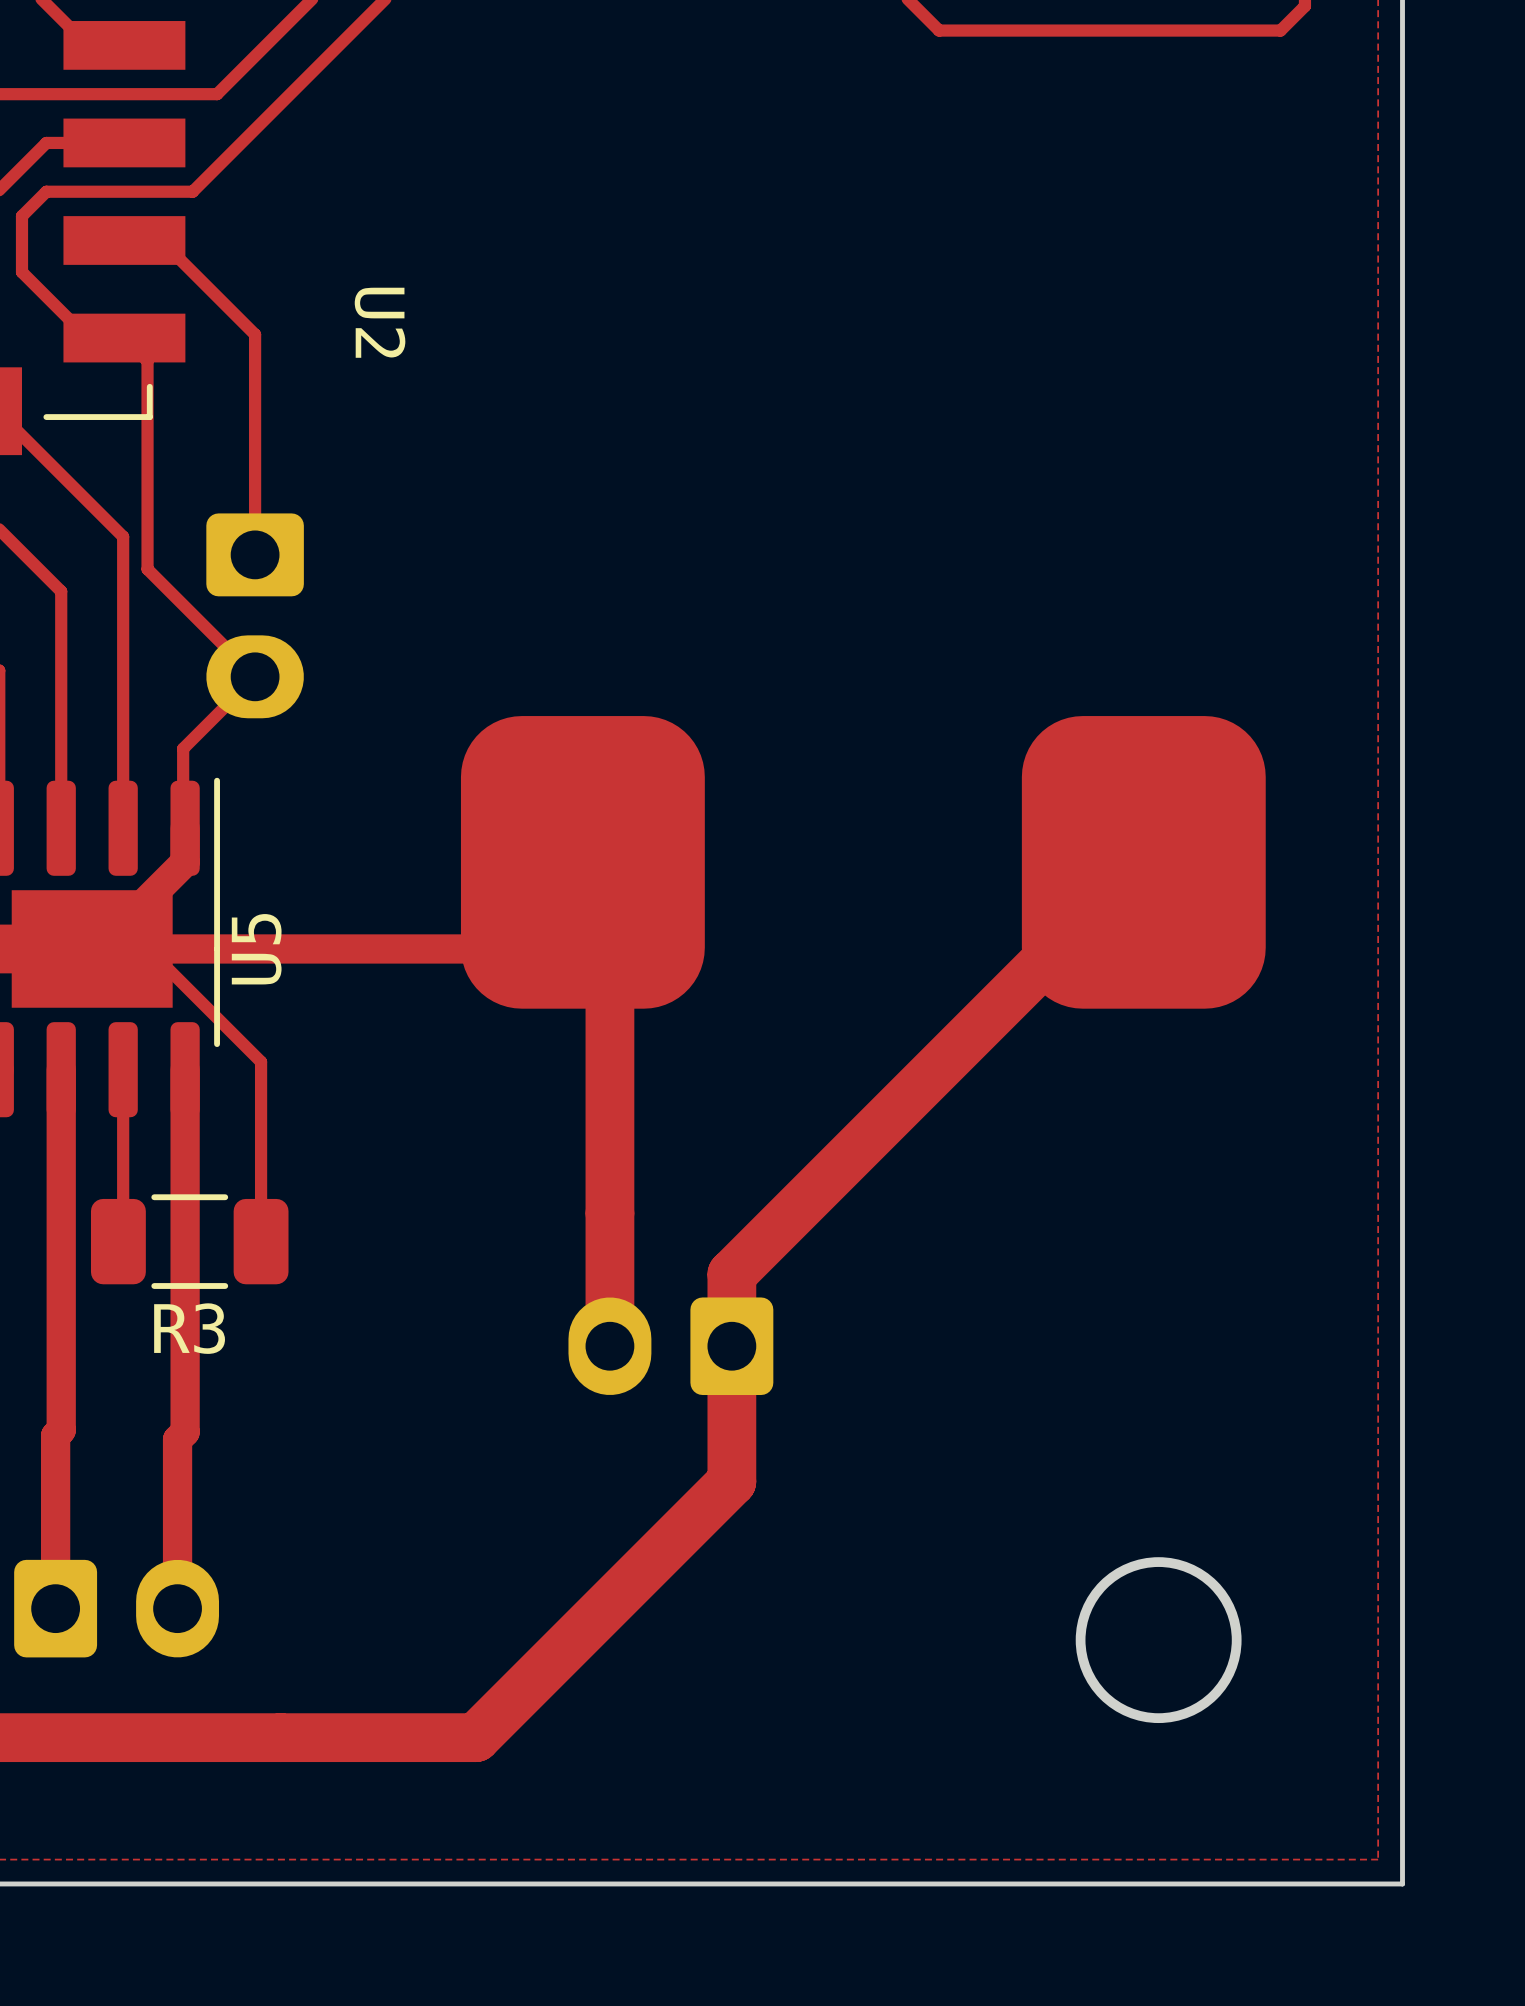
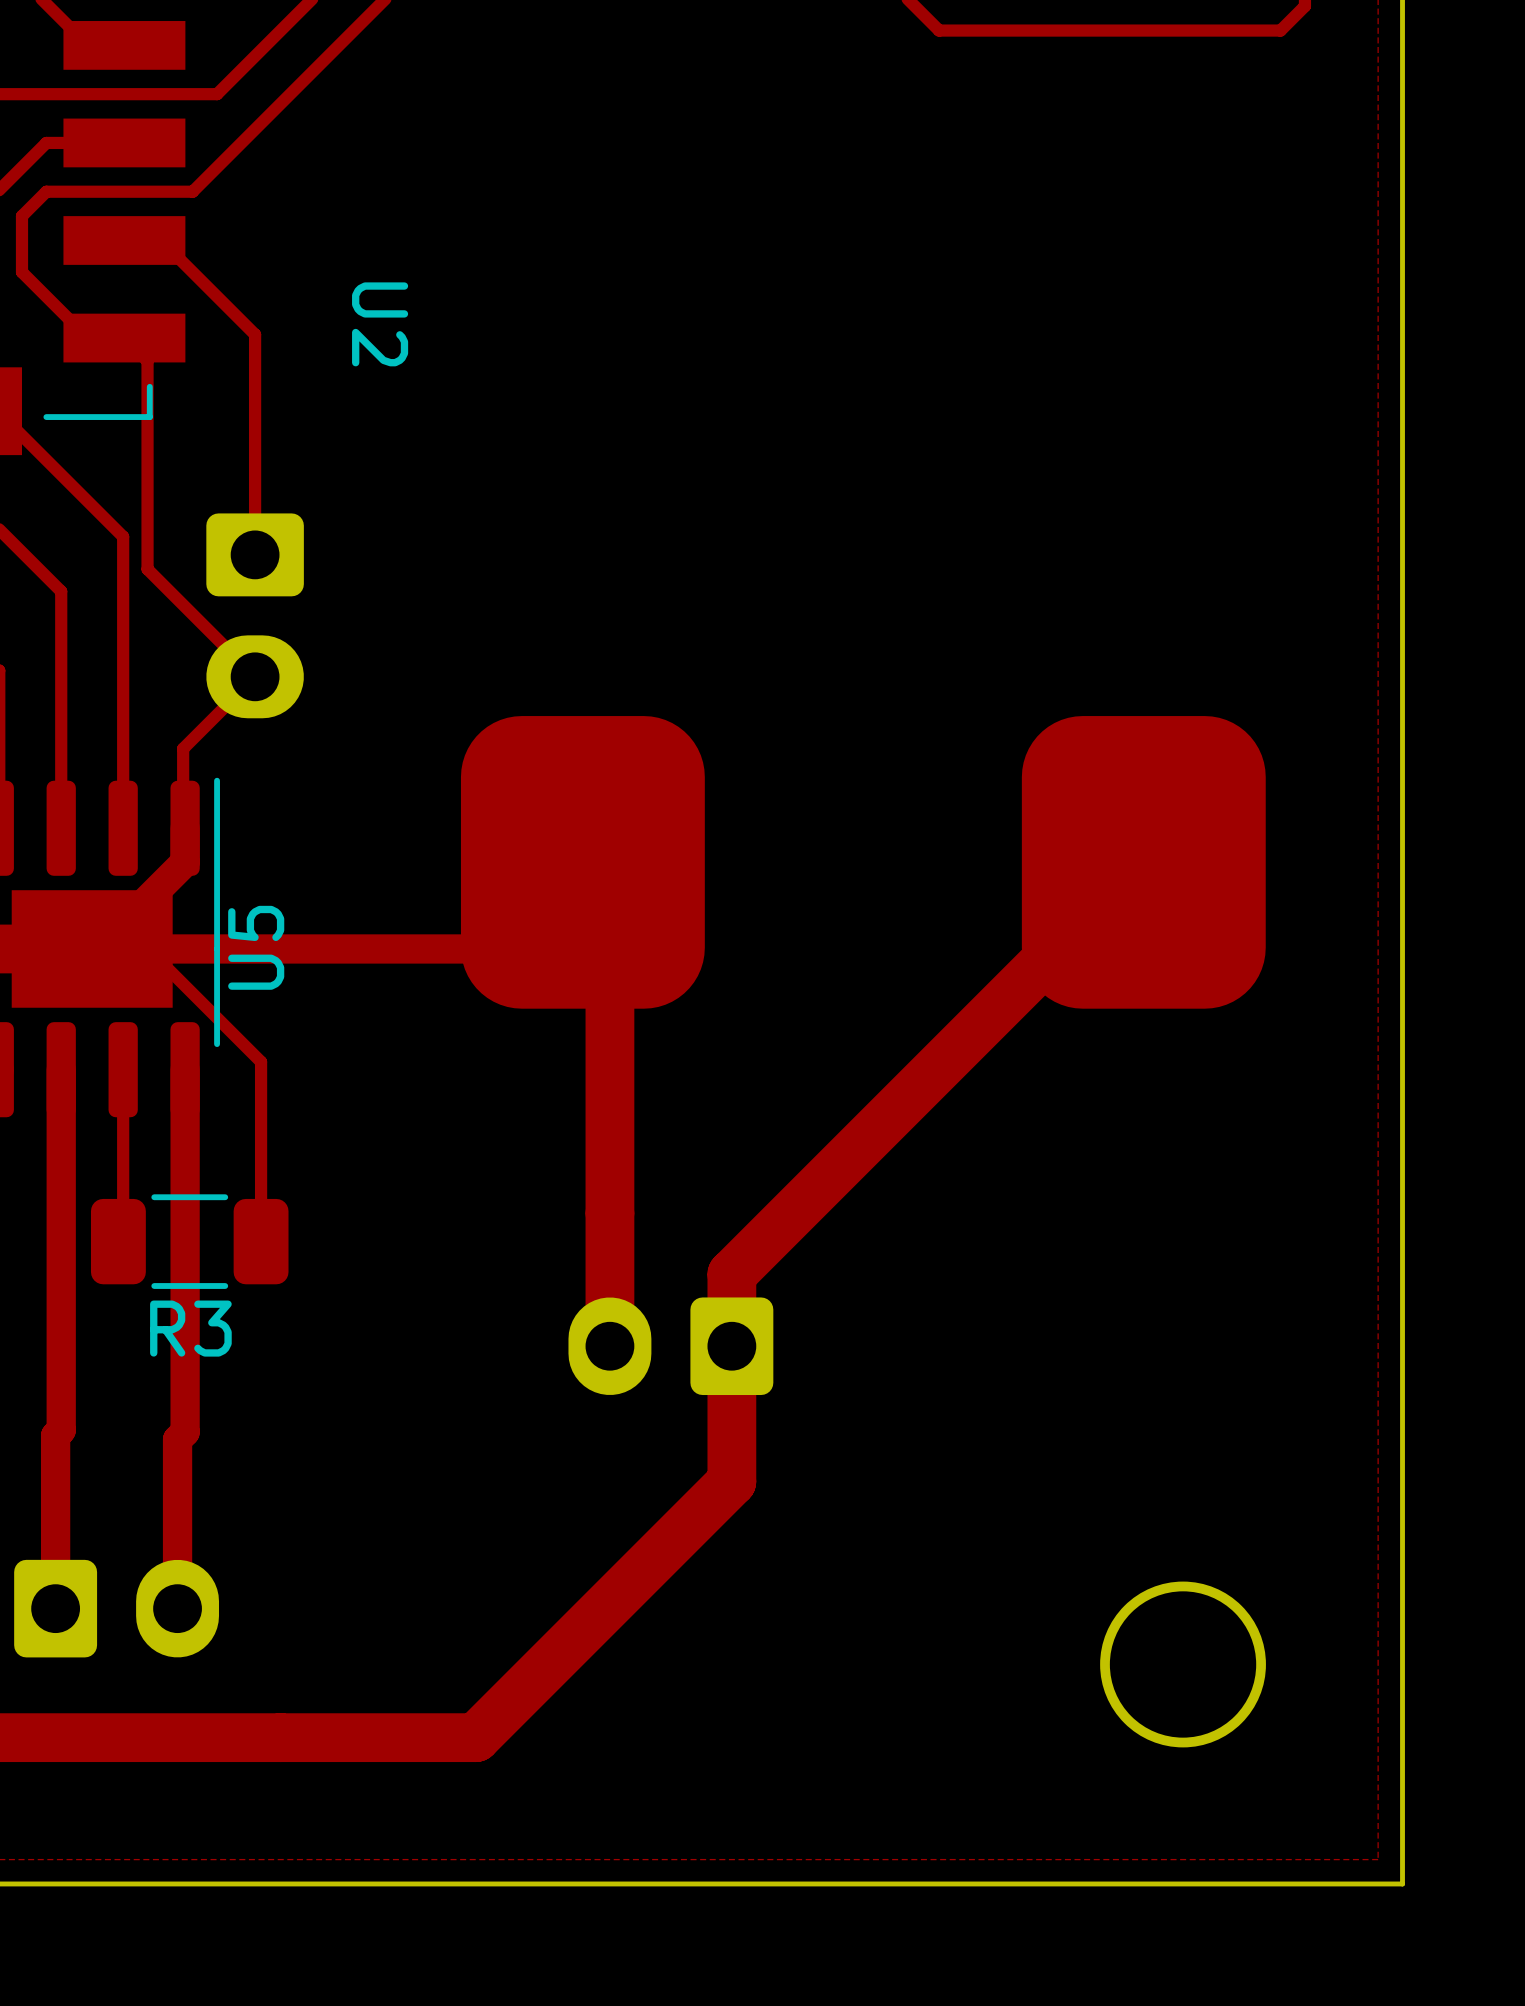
round board edge position: (1158, 1640) -> (1183, 1664)

